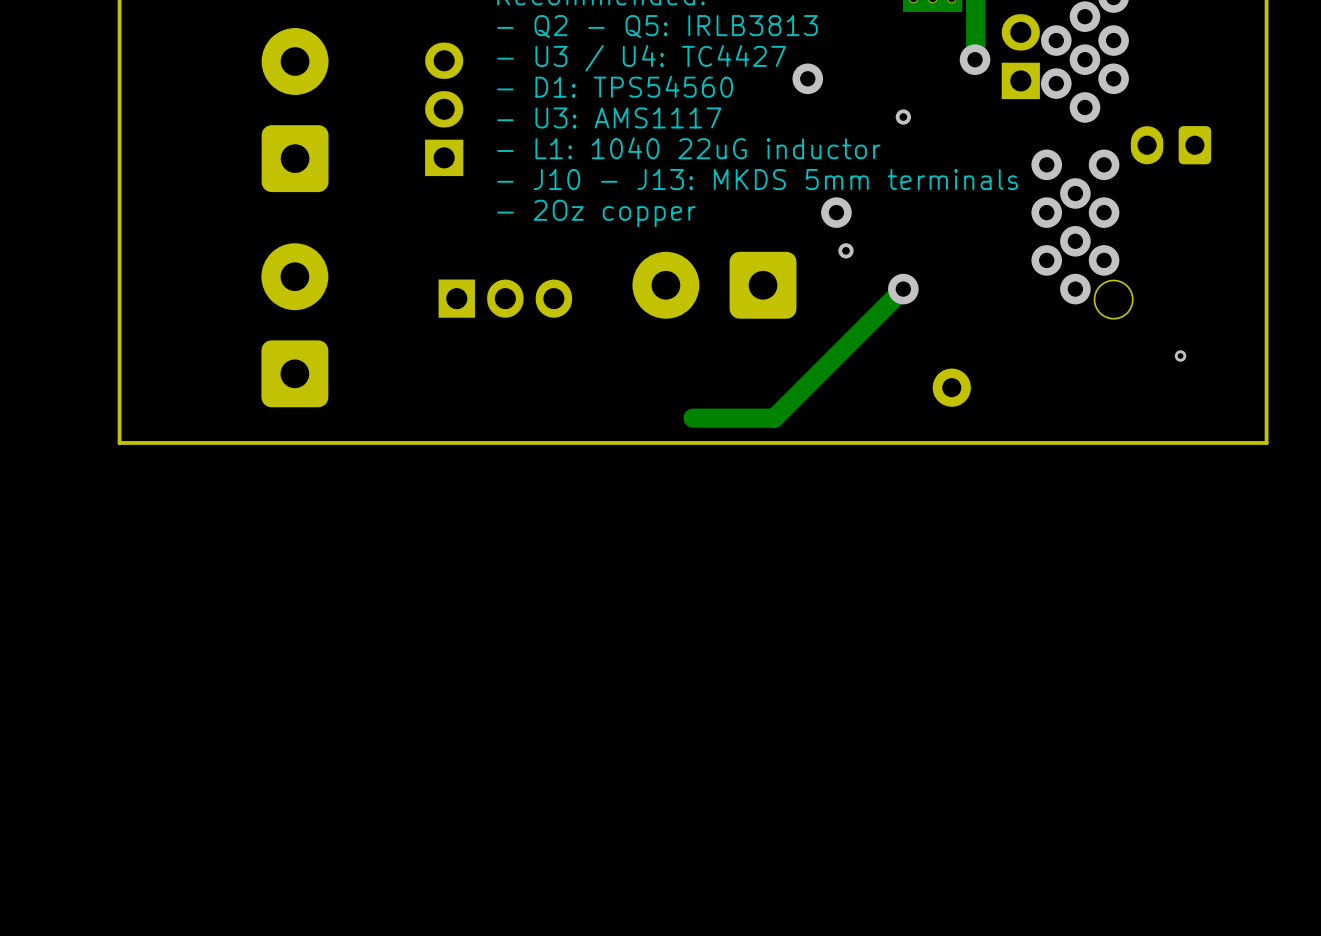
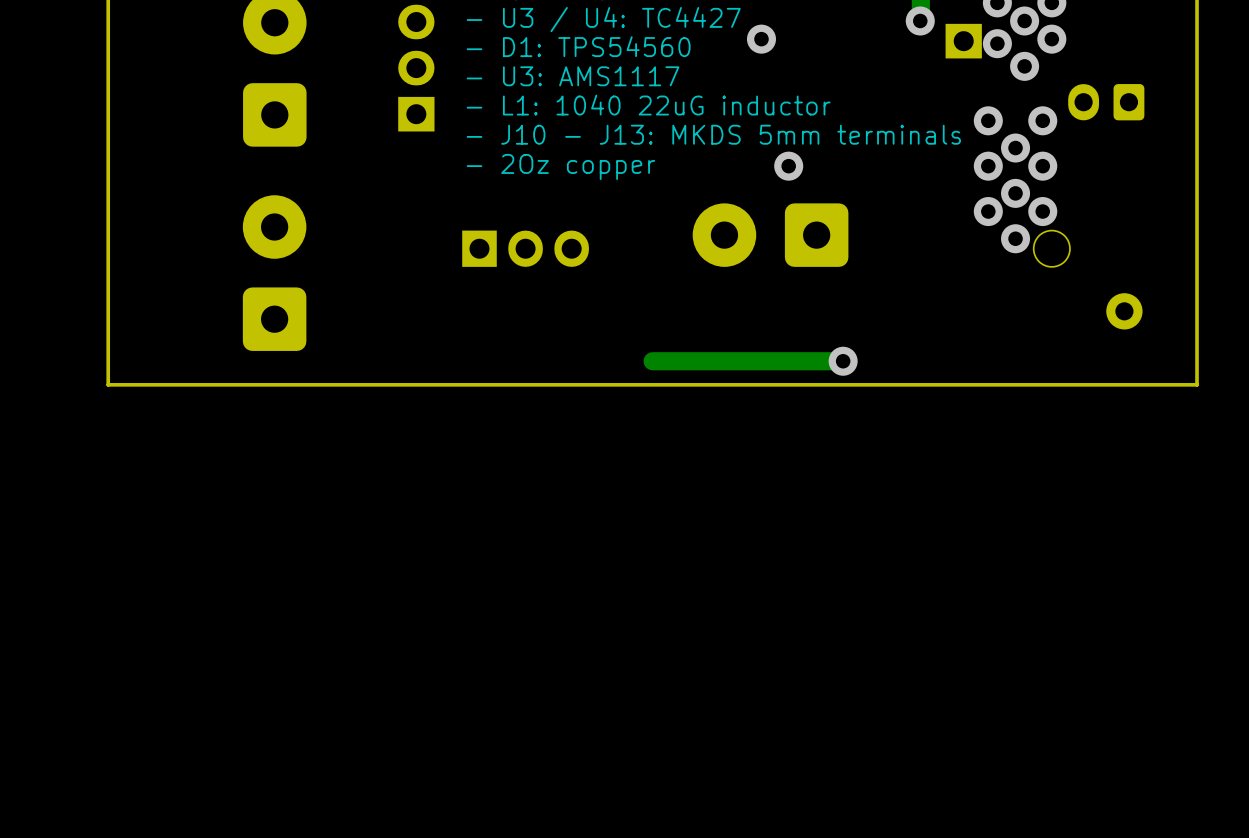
via: (903, 117) -> none
via: (846, 250) -> none
part position: (714, 285) -> (770, 235)
track: (903, 289) (774, 418) -> (843, 361) (729, 361)
via: (903, 289) -> none
part position: (505, 298) -> (525, 248)
via: (1180, 355) -> none
part position: (951, 387) -> (1124, 311)
via: none -> (843, 361)

